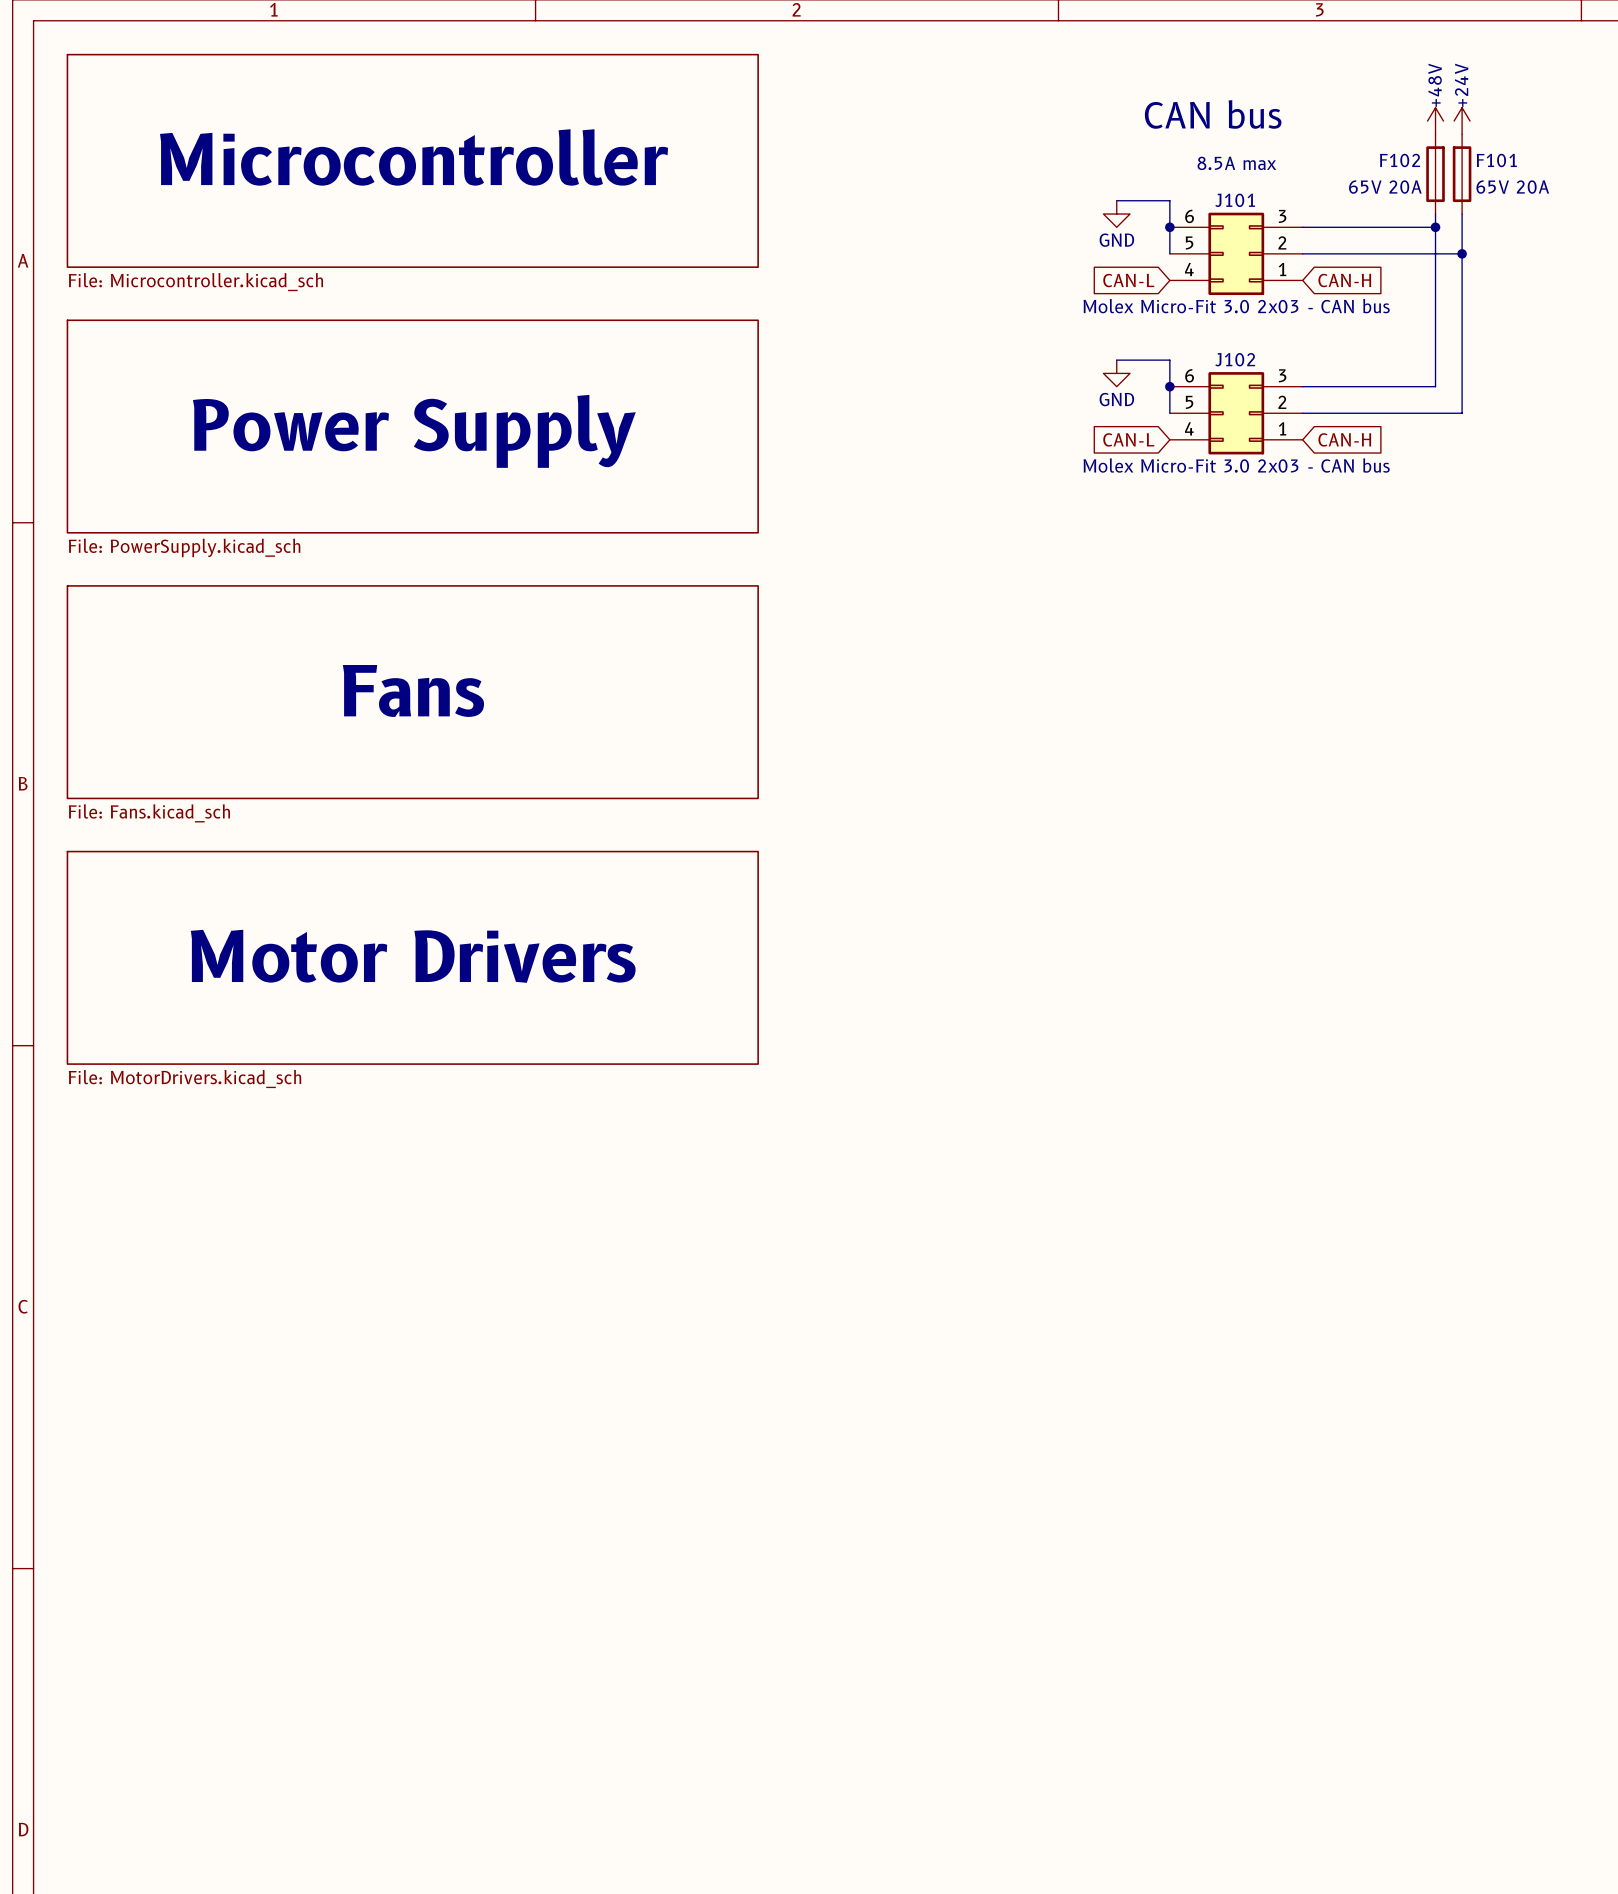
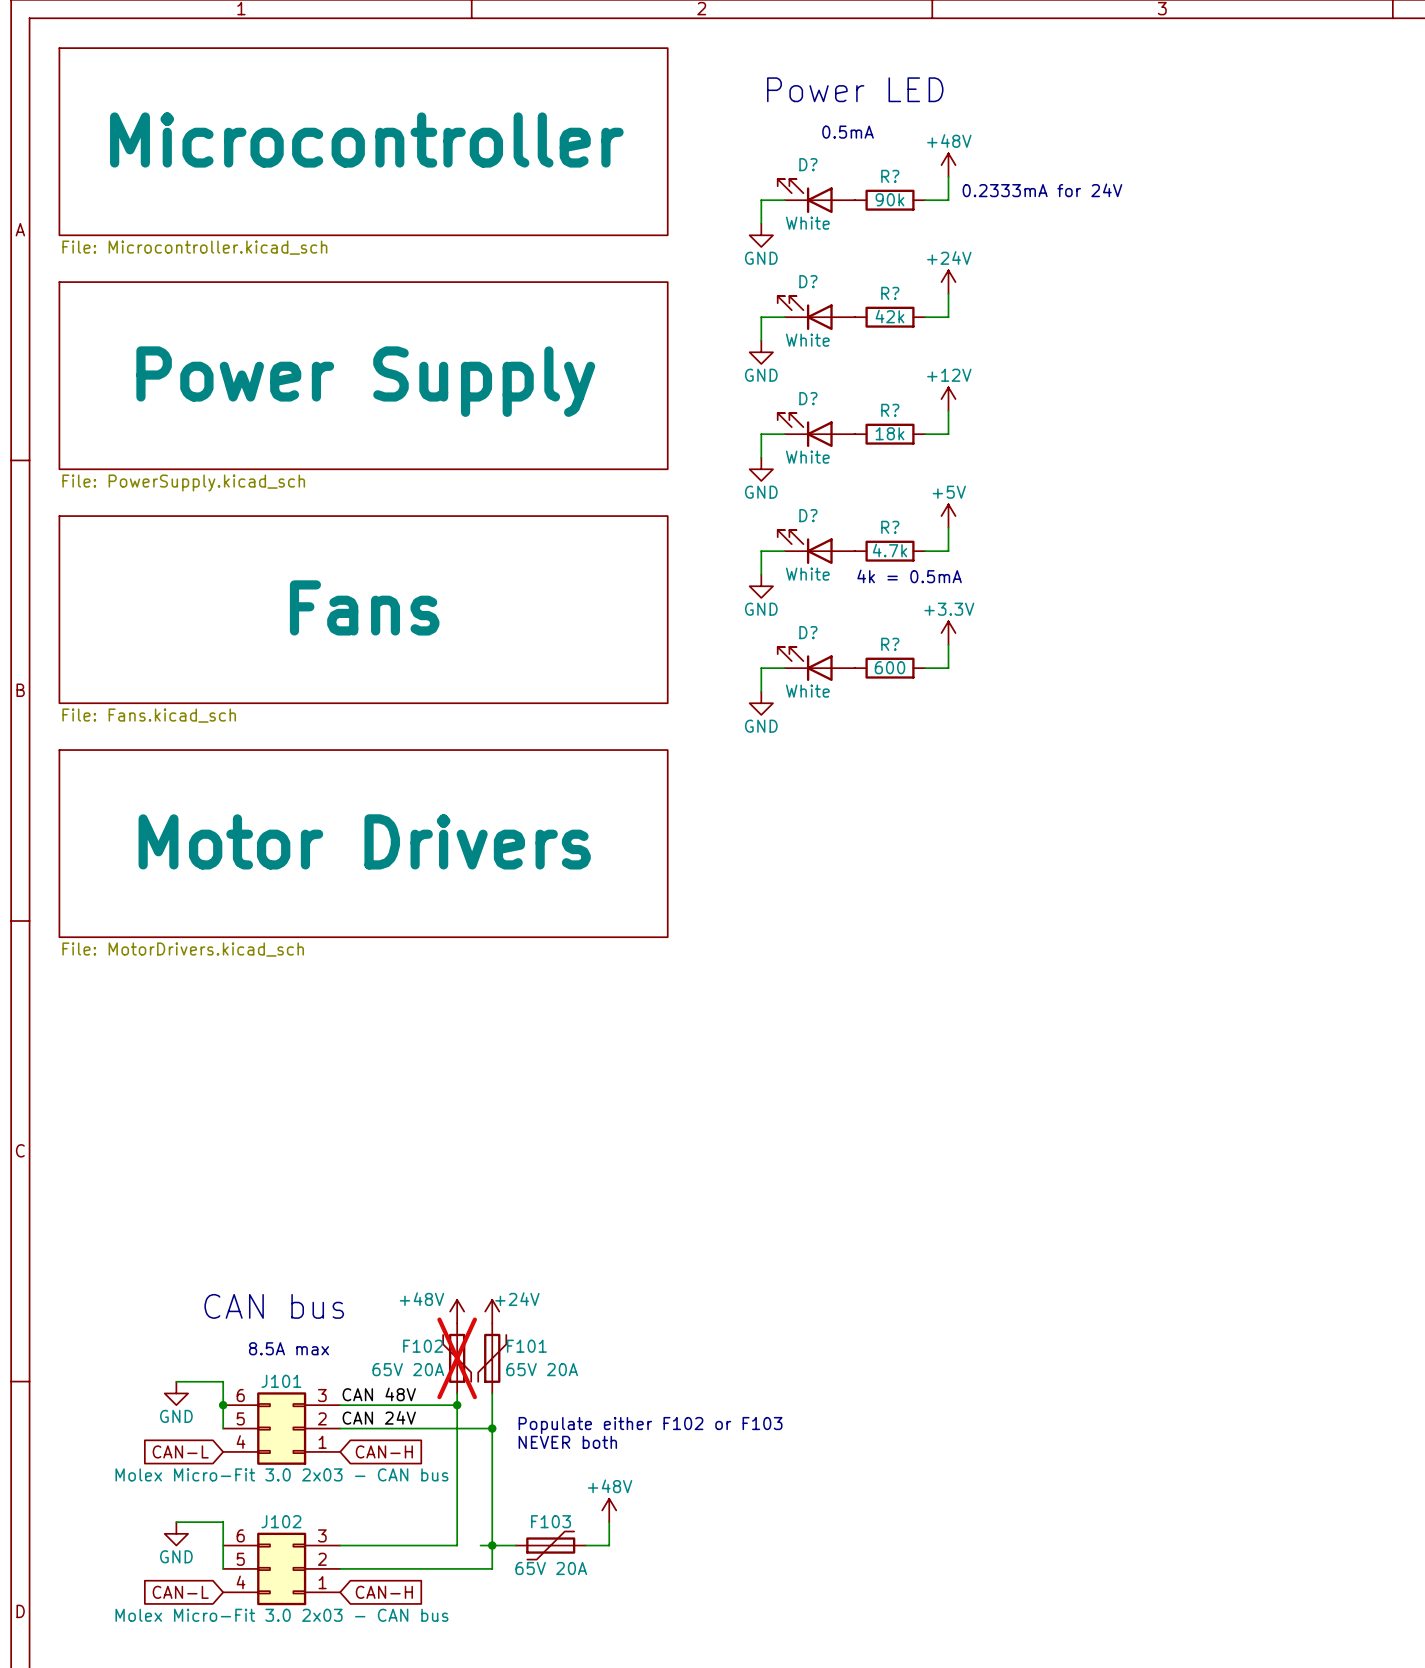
text: none -> Power LED (855, 89)
text: CAN bus (1213, 114) -> none
power symbol: +48V (1435, 121) -> none
power symbol: +24V (1462, 121) -> none
F102 symbol: [1426, 134, 1445, 215] -> [443, 1323, 472, 1394]
F101 symbol: [1452, 134, 1472, 215] -> [478, 1323, 507, 1394]
text: none -> 0.5mA (848, 132)
text: 8.5A max (1236, 163) -> none
power symbol: none -> +48V (948, 165)
wire: none -> (948, 176) (948, 200) (925, 200)
wire: (1116, 200) (1169, 200) (1169, 253) -> none
power symbol: GND (1116, 214) -> none
wire: (1435, 214) (1435, 386) (1302, 386) -> none
wire: (1462, 214) (1462, 413) (1302, 413) -> none
text: none -> 0.2333mA for 24V (1042, 190)
D?: none -> White (816, 196)
wire: none -> (784, 200) (761, 200) (761, 223)
R?: none -> 90k (890, 200)
junction: (1169, 227) -> none
wire: (1302, 227) (1435, 227) -> none
junction: (1435, 227) -> none
J101 position: (1236, 253) -> (281, 1428)
wire: (1302, 253) (1462, 253) -> none
junction: (1462, 253) -> none
power symbol: none -> GND (761, 235)
global label: CAN-L (1128, 280) -> none
global label: CAN-H (1344, 280) -> none
power symbol: none -> +24V (948, 282)
wire: none -> (948, 293) (948, 317) (925, 317)
D?: none -> White (816, 313)
wire: none -> (784, 317) (761, 317) (761, 340)
R?: none -> 42k (890, 317)
wire: (1116, 360) (1169, 360) (1169, 413) -> none
power symbol: GND (1116, 373) -> none
junction: (1169, 386) -> none
power symbol: none -> GND (761, 352)
J102 position: (1236, 413) -> (281, 1568)
global label: CAN-L (1128, 439) -> none
global label: CAN-H (1344, 439) -> none
power symbol: none -> +12V (948, 399)
wire: none -> (948, 410) (948, 434) (925, 434)
D?: none -> White (816, 430)
wire: none -> (784, 434) (761, 434) (761, 457)
R?: none -> 18k (890, 434)
power symbol: none -> GND (761, 469)
power symbol: none -> +5V (948, 516)
wire: none -> (948, 527) (948, 551) (925, 551)
D?: none -> White (816, 547)
wire: none -> (784, 551) (761, 551) (761, 574)
R?: none -> 4.7k (890, 551)
text: none -> 4k = 0.5mA (909, 576)
power symbol: none -> GND (761, 586)
power symbol: none -> +3.3V (948, 633)
wire: none -> (948, 644) (948, 668) (925, 668)
D?: none -> White (816, 664)
wire: none -> (784, 668) (761, 668) (761, 691)
R?: none -> 600 (890, 668)
power symbol: none -> GND (761, 703)
text: none -> CAN bus (274, 1306)
power symbol: none -> +48V (457, 1311)
power symbol: none -> +24V (492, 1311)
text: none -> 8.5A max (289, 1348)
F102 do-not-place cross: none -> (457, 1358)
wire: none -> (176, 1381) (223, 1381) (223, 1428)
power symbol: none -> GND (176, 1393)
wire: none -> (457, 1393) (457, 1545) (340, 1545)
wire: none -> (492, 1393) (492, 1568) (340, 1568)
label: none -> CAN 48V (379, 1394)
junction: none -> (223, 1405)
wire: none -> (340, 1405) (457, 1405)
junction: none -> (457, 1405)
label: none -> CAN 24V (379, 1417)
text: none -> Populate either F102 or F103 (650, 1425)
wire: none -> (340, 1428) (492, 1428)
junction: none -> (492, 1428)
text: none -> NEVER both (567, 1442)
global label: none -> CAN-L (180, 1451)
global label: none -> CAN-H (384, 1451)
power symbol: none -> +48V (609, 1510)
wire: none -> (176, 1522) (223, 1522) (223, 1568)
wire: none -> (609, 1522) (609, 1545) (585, 1545)
power symbol: none -> GND (176, 1533)
wire: none -> (480, 1545) (515, 1545)
junction: none -> (492, 1545)
F103: none -> 65V 20A (550, 1545)
global label: none -> CAN-L (180, 1592)
global label: none -> CAN-H (384, 1592)

